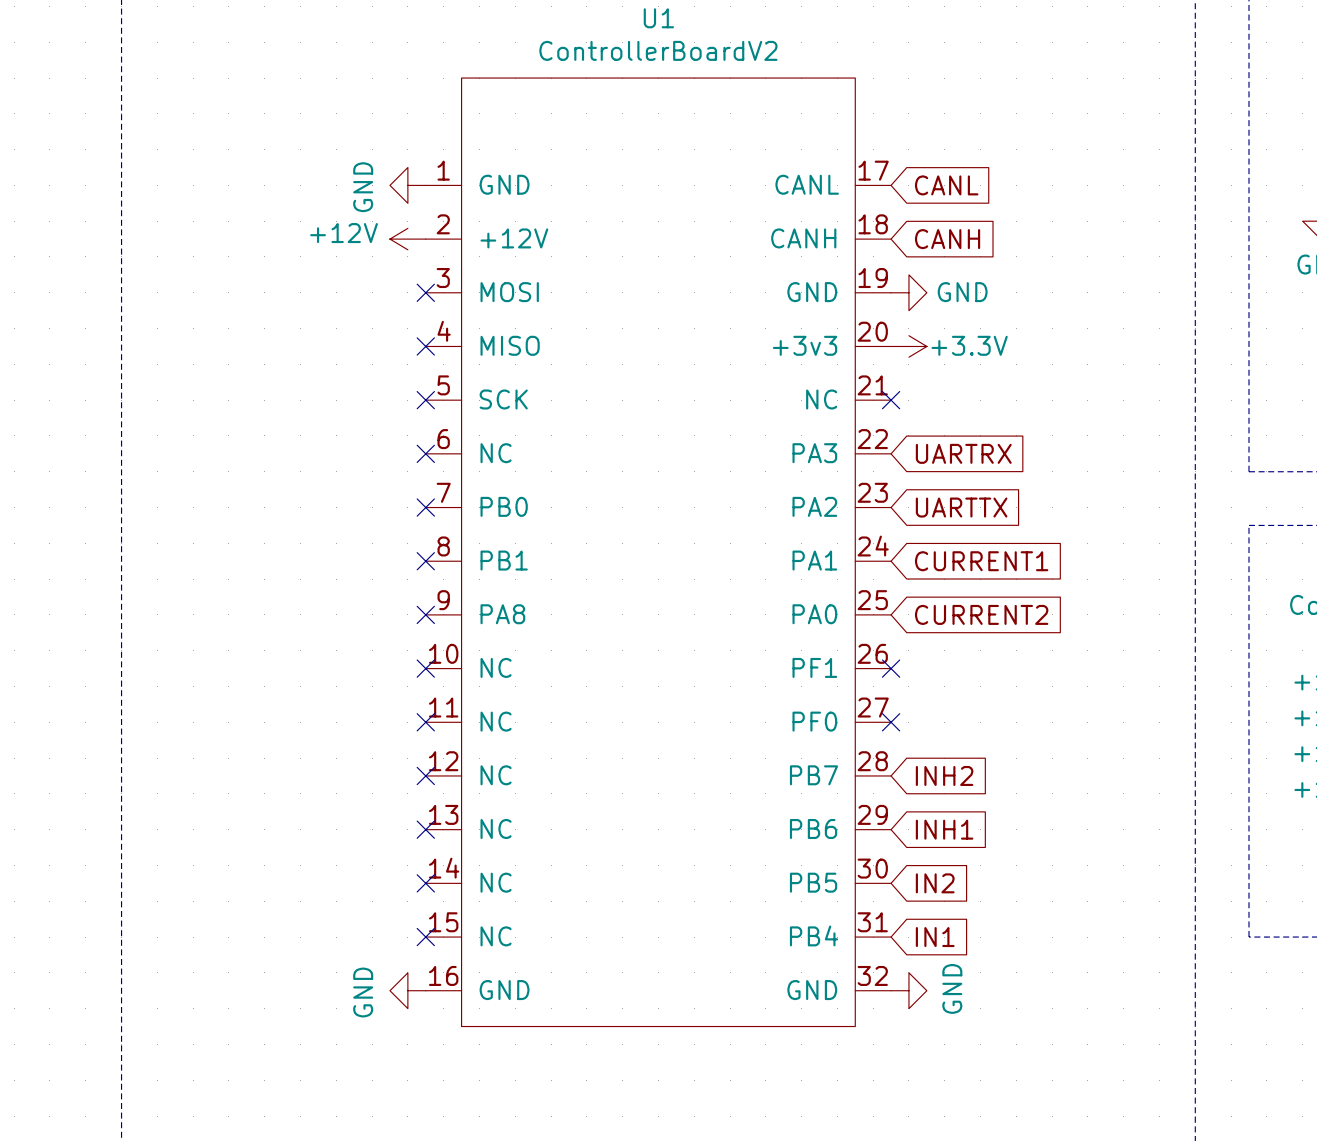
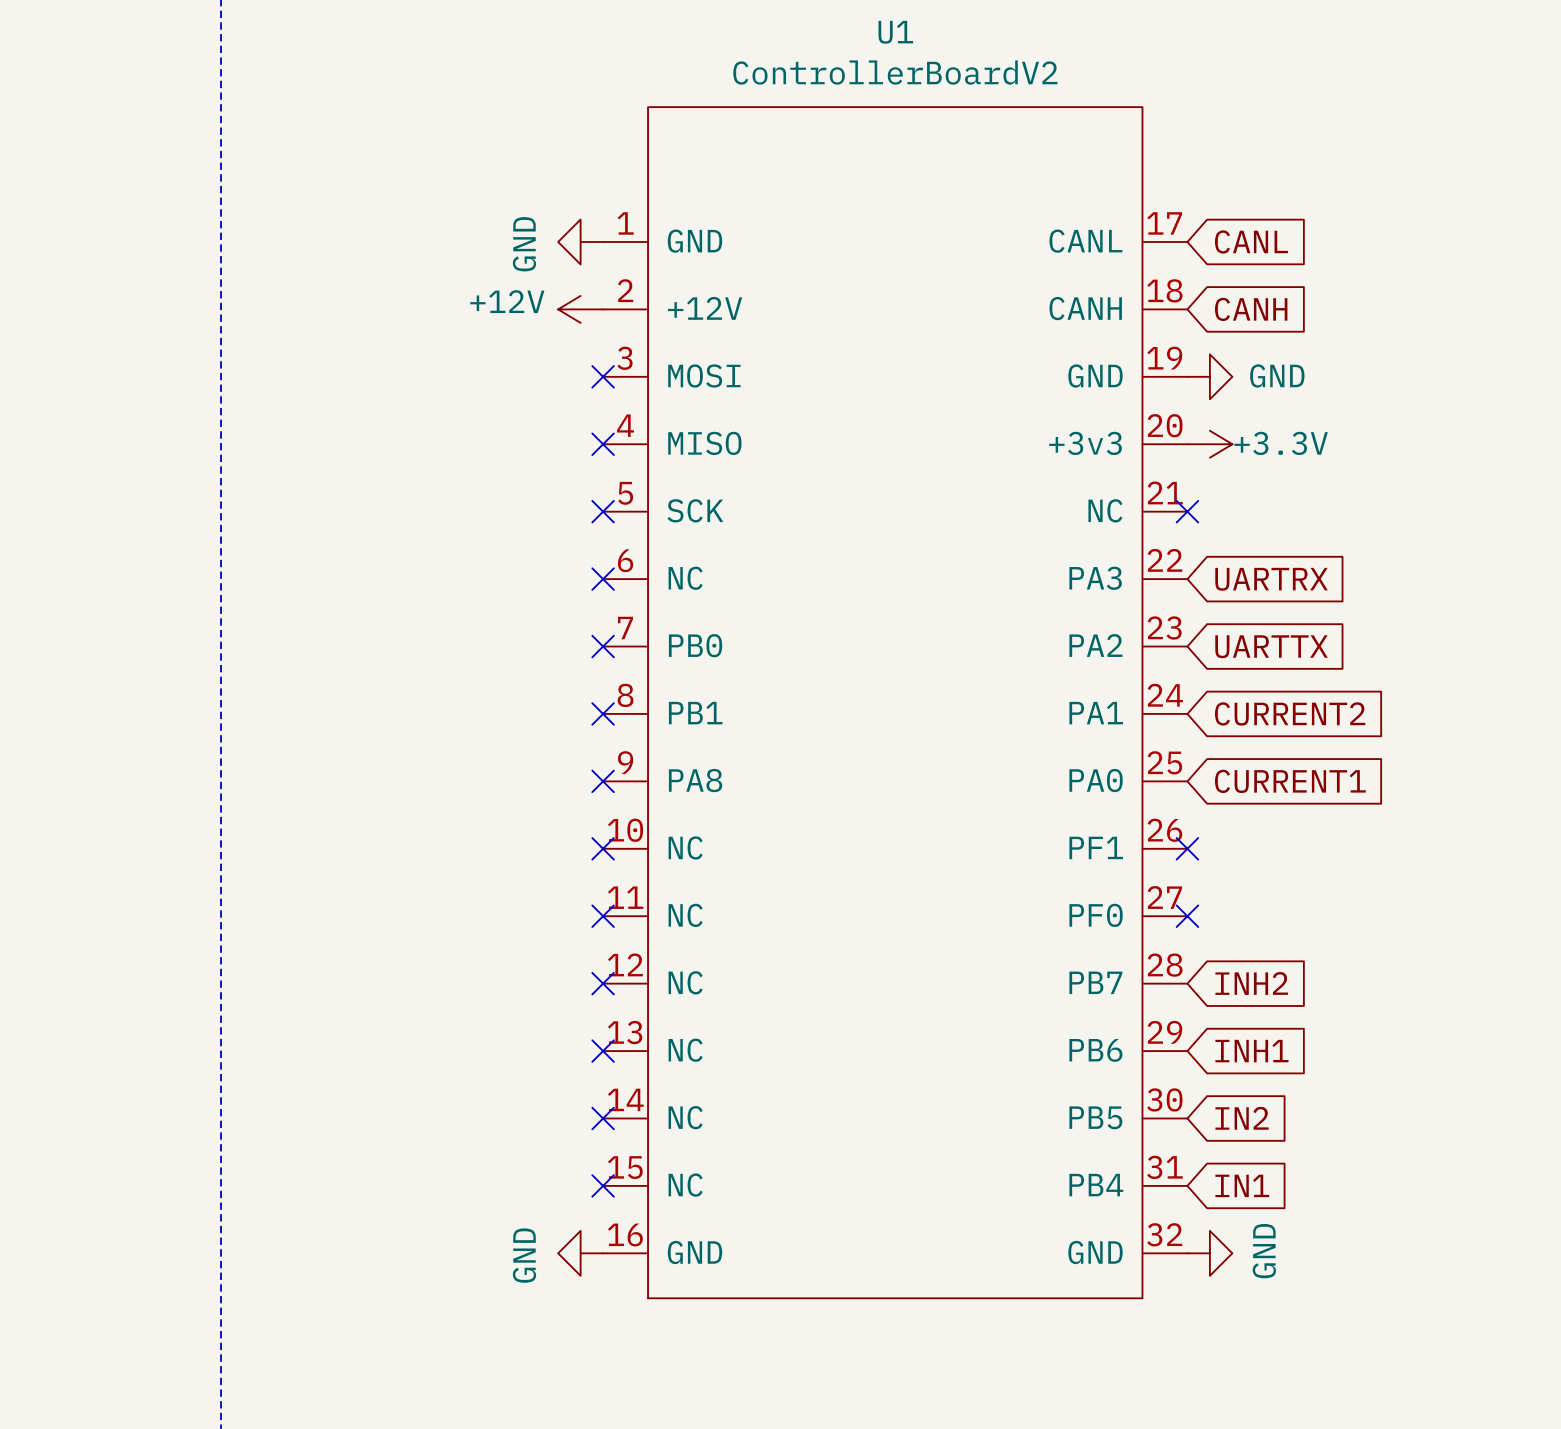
global label: CURRENT1 (981, 561) -> CURRENT2 (1290, 713)
global label: CURRENT2 (981, 614) -> CURRENT1 (1290, 781)

